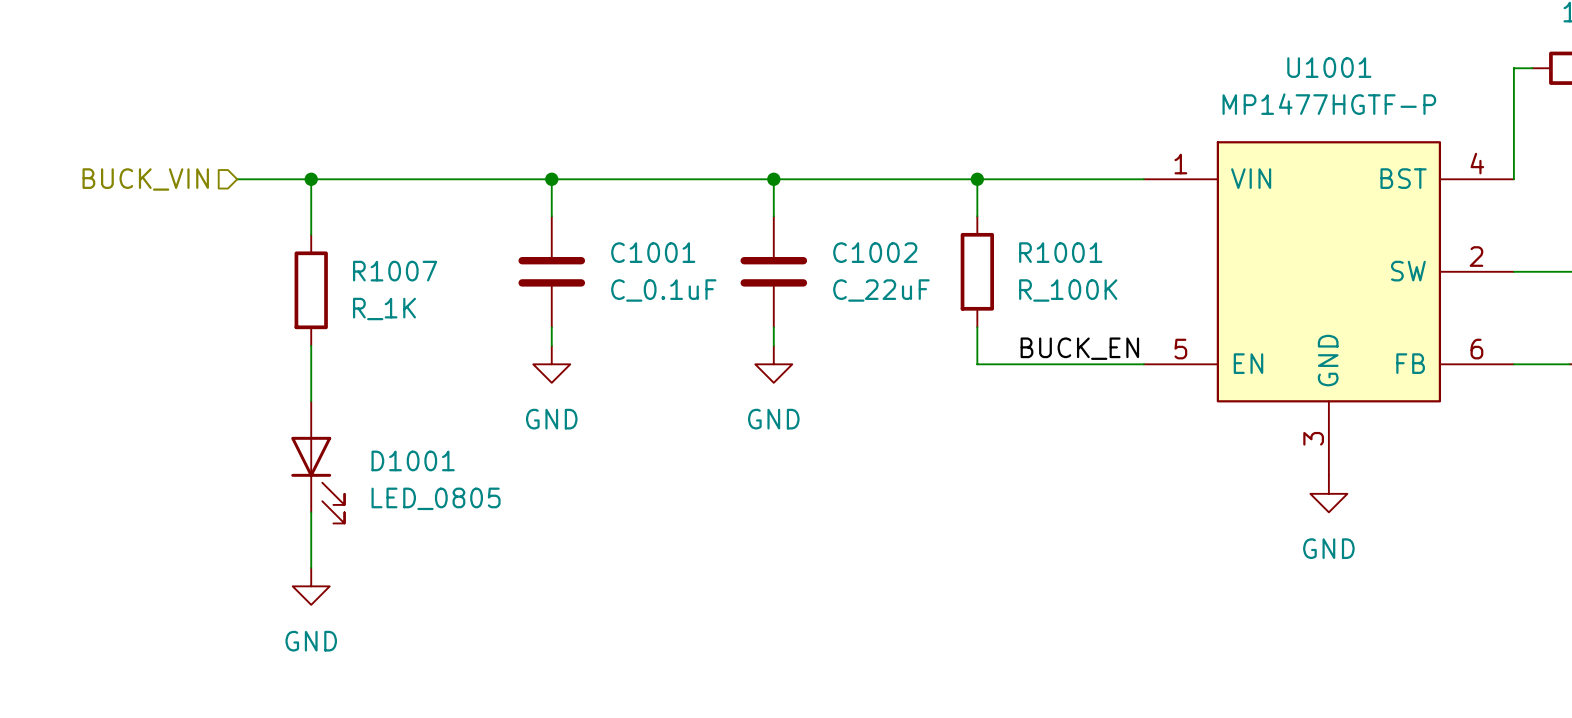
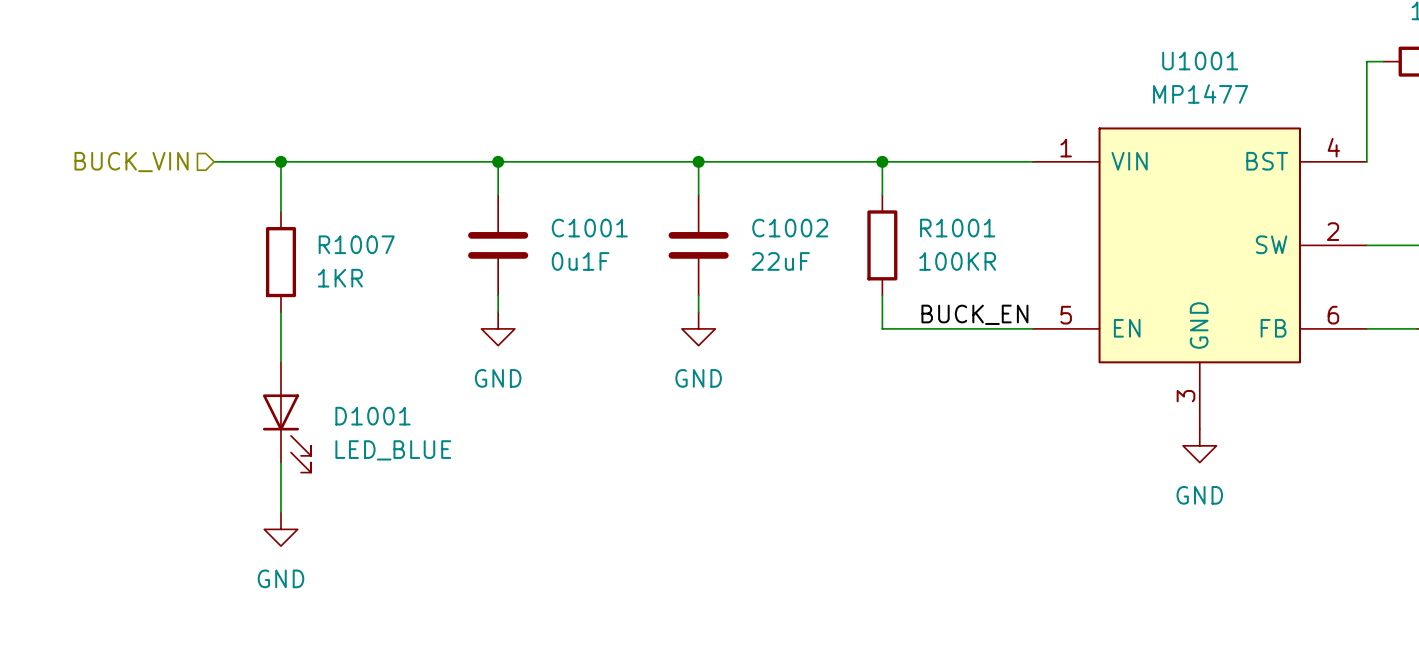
U1001 value: MP1477HGTF-P (1329, 104) -> MP1477 (1200, 94)
C1001 value: C_0.1uF (663, 290) -> 0u1F (580, 261)
C1002 value: C_22uF (881, 290) -> 22uF (780, 261)
R1001 value: R_100K (1068, 290) -> 100KR (957, 261)
R1007 value: R_1K (384, 308) -> 1KR (340, 278)
D1001 value: LED_0805 (436, 498) -> LED_BLUE (393, 450)

